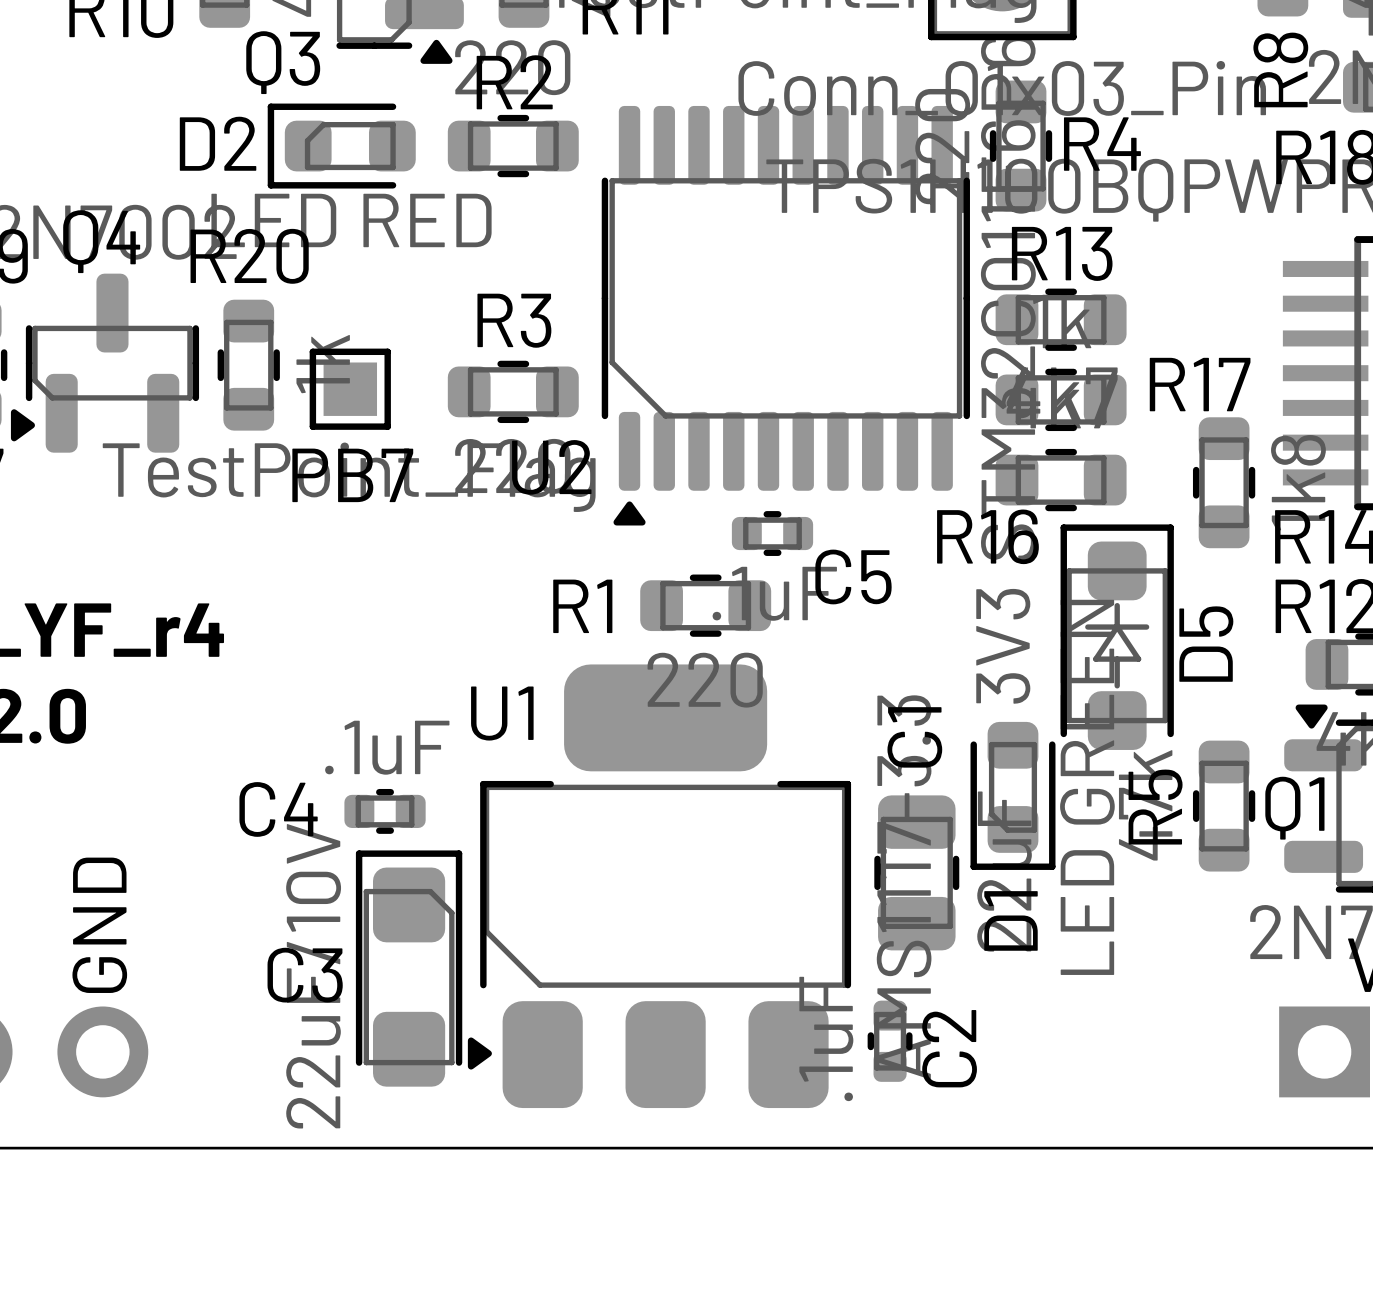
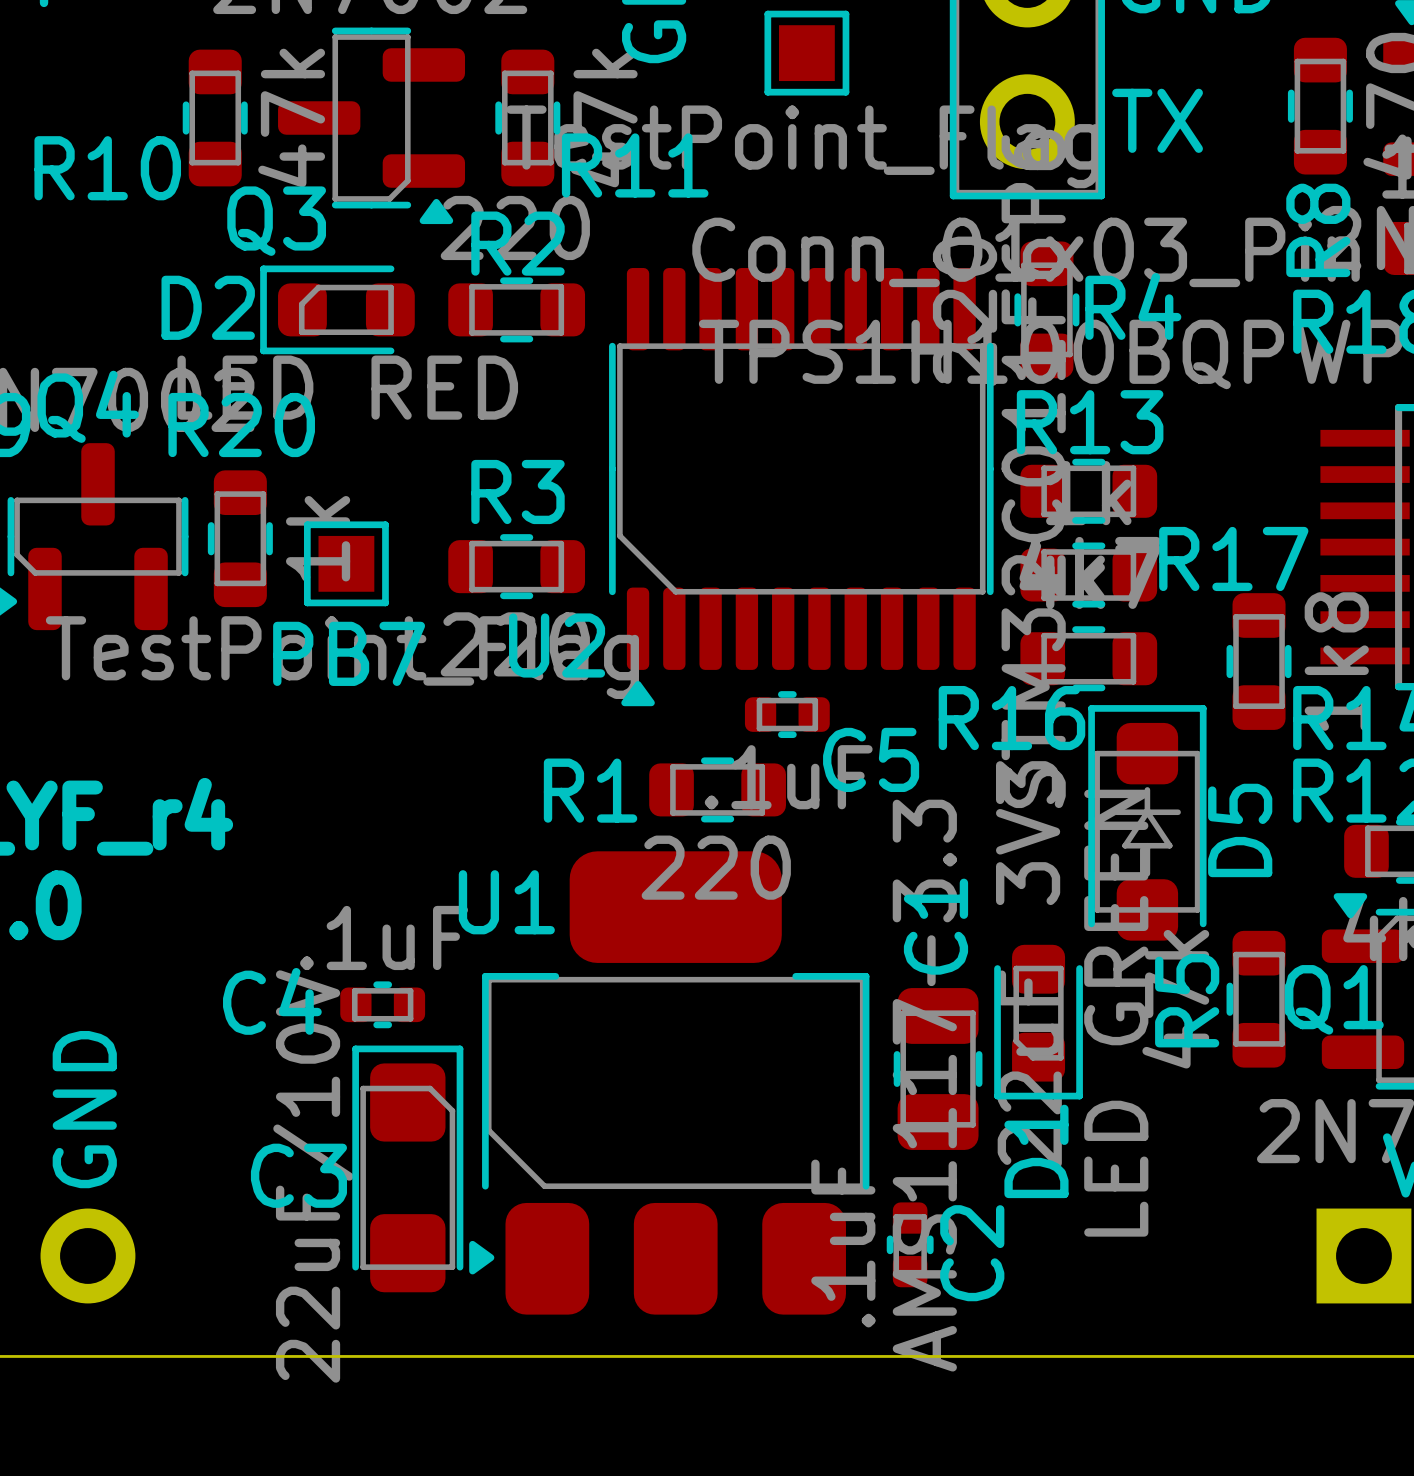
D1 position: (1012, 795) -> (1038, 1022)

